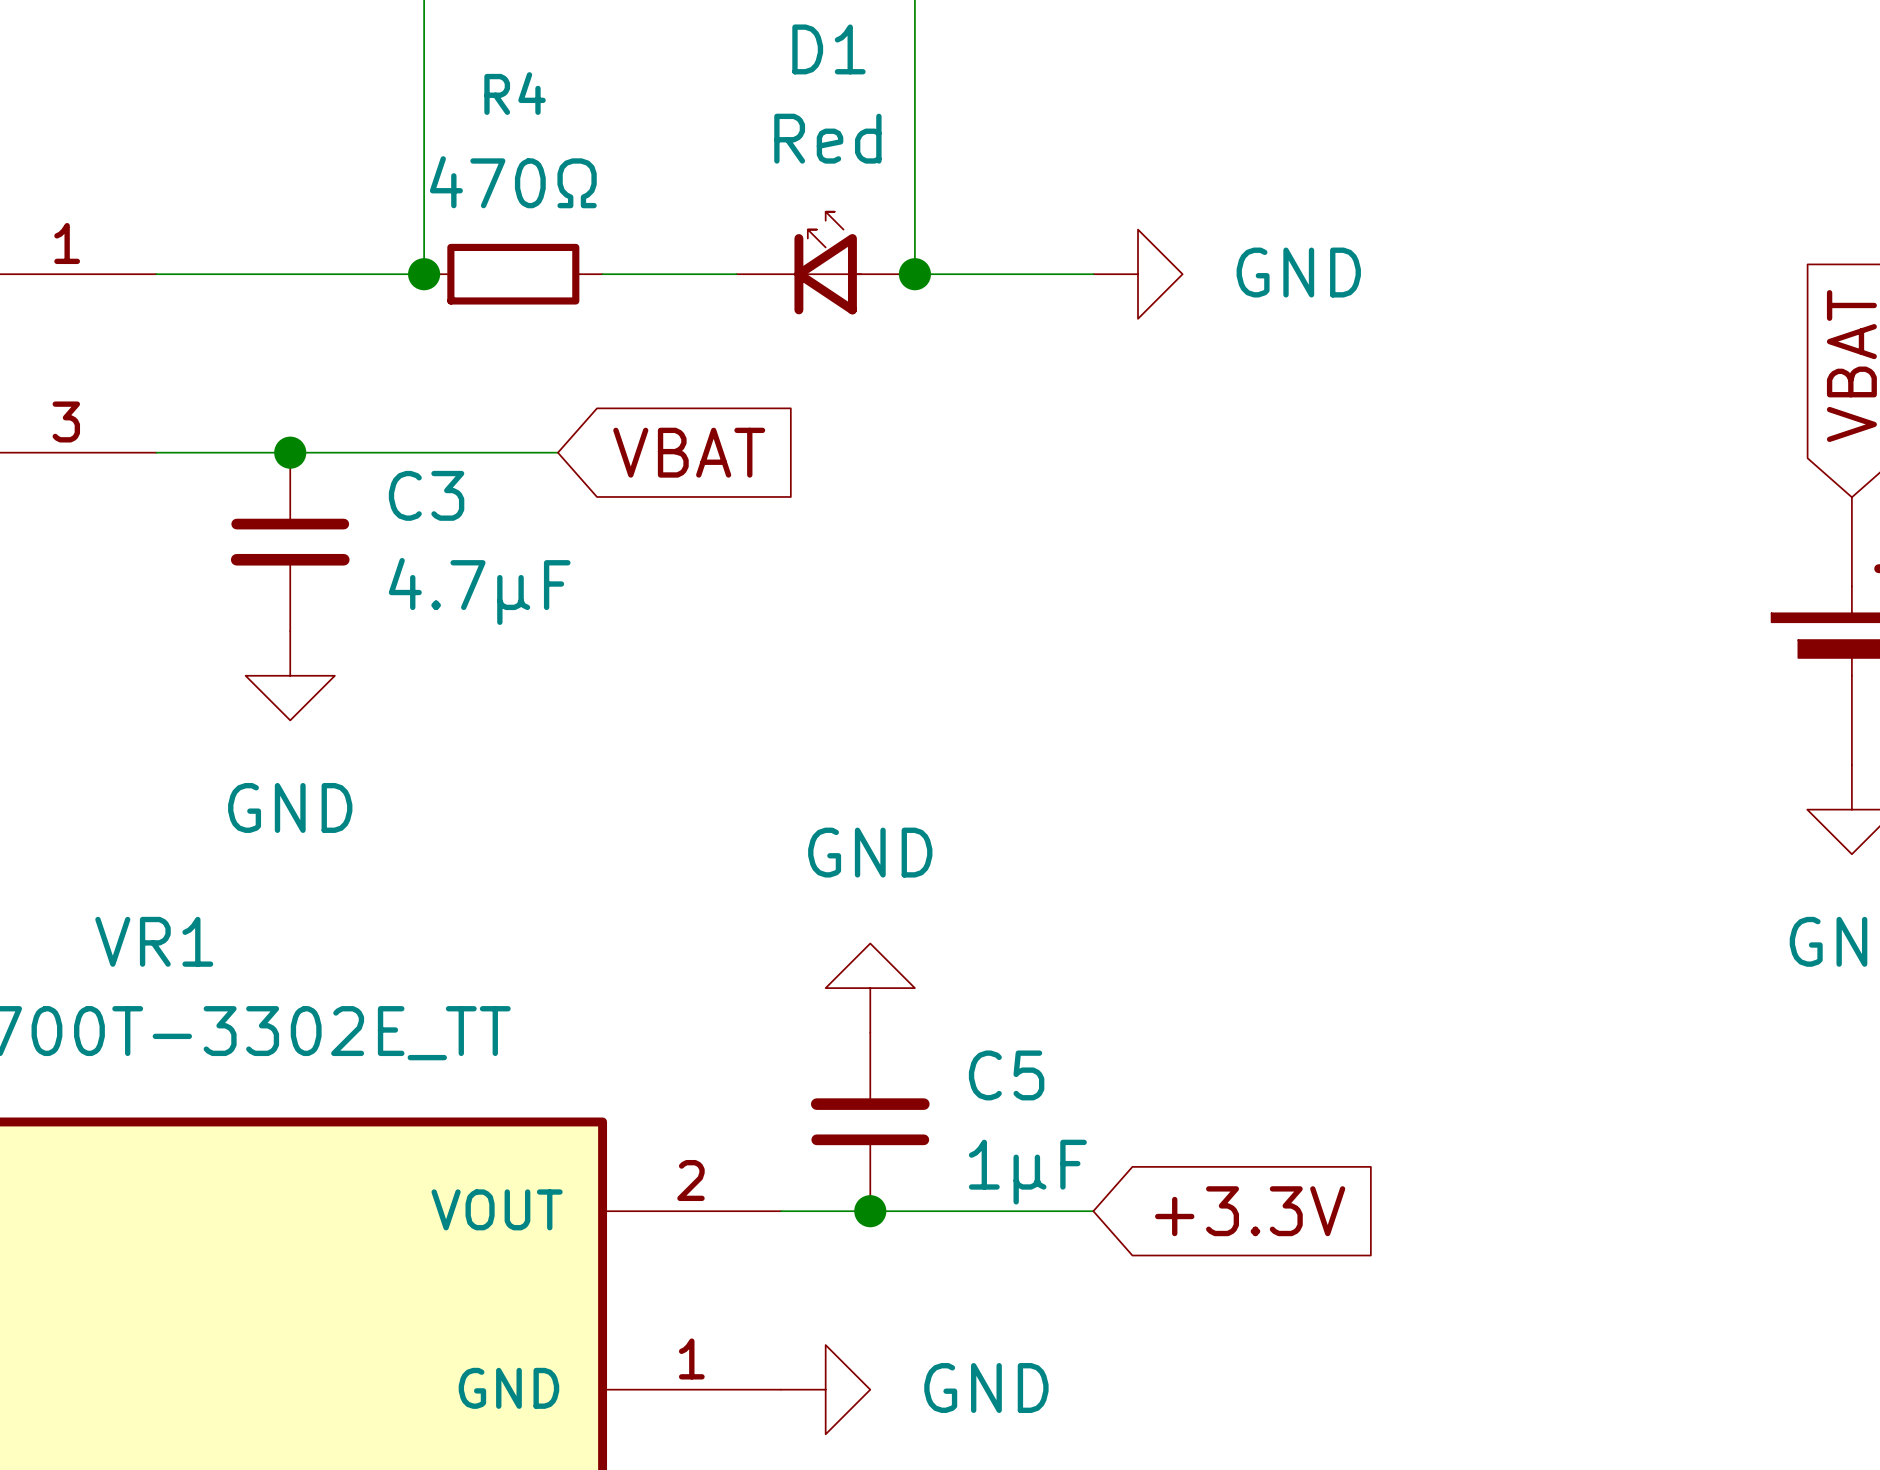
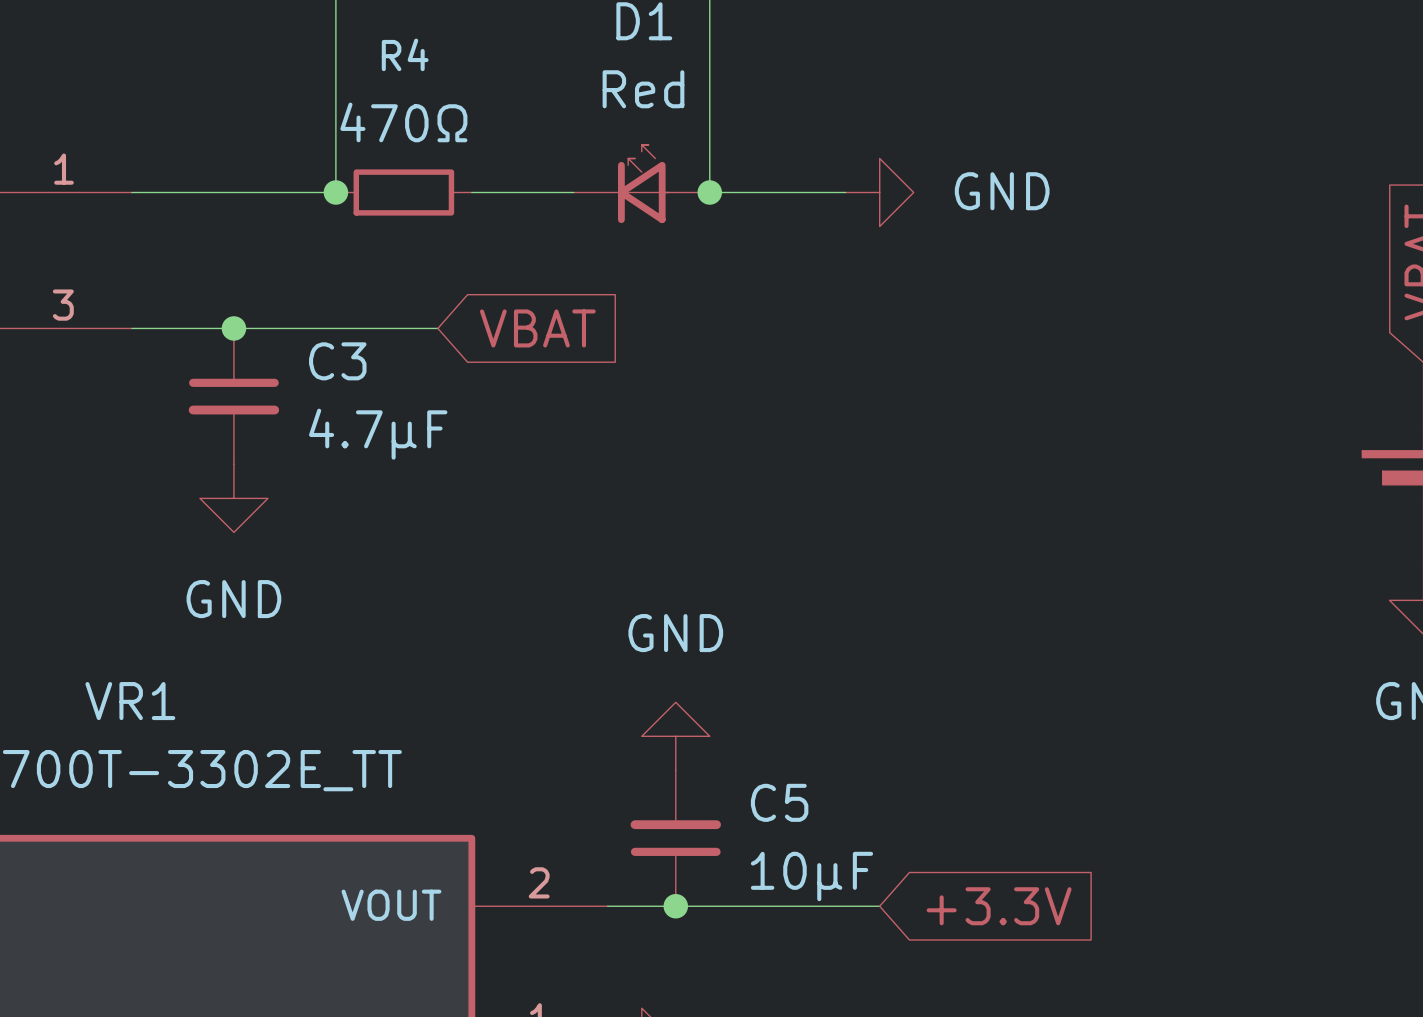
C5 value: 1μF (1027, 1172) -> 10μF (811, 876)
wire: none -> (845, 906) (879, 906)
global label position: +3.3V (1250, 1211) -> +3.3V (999, 906)

